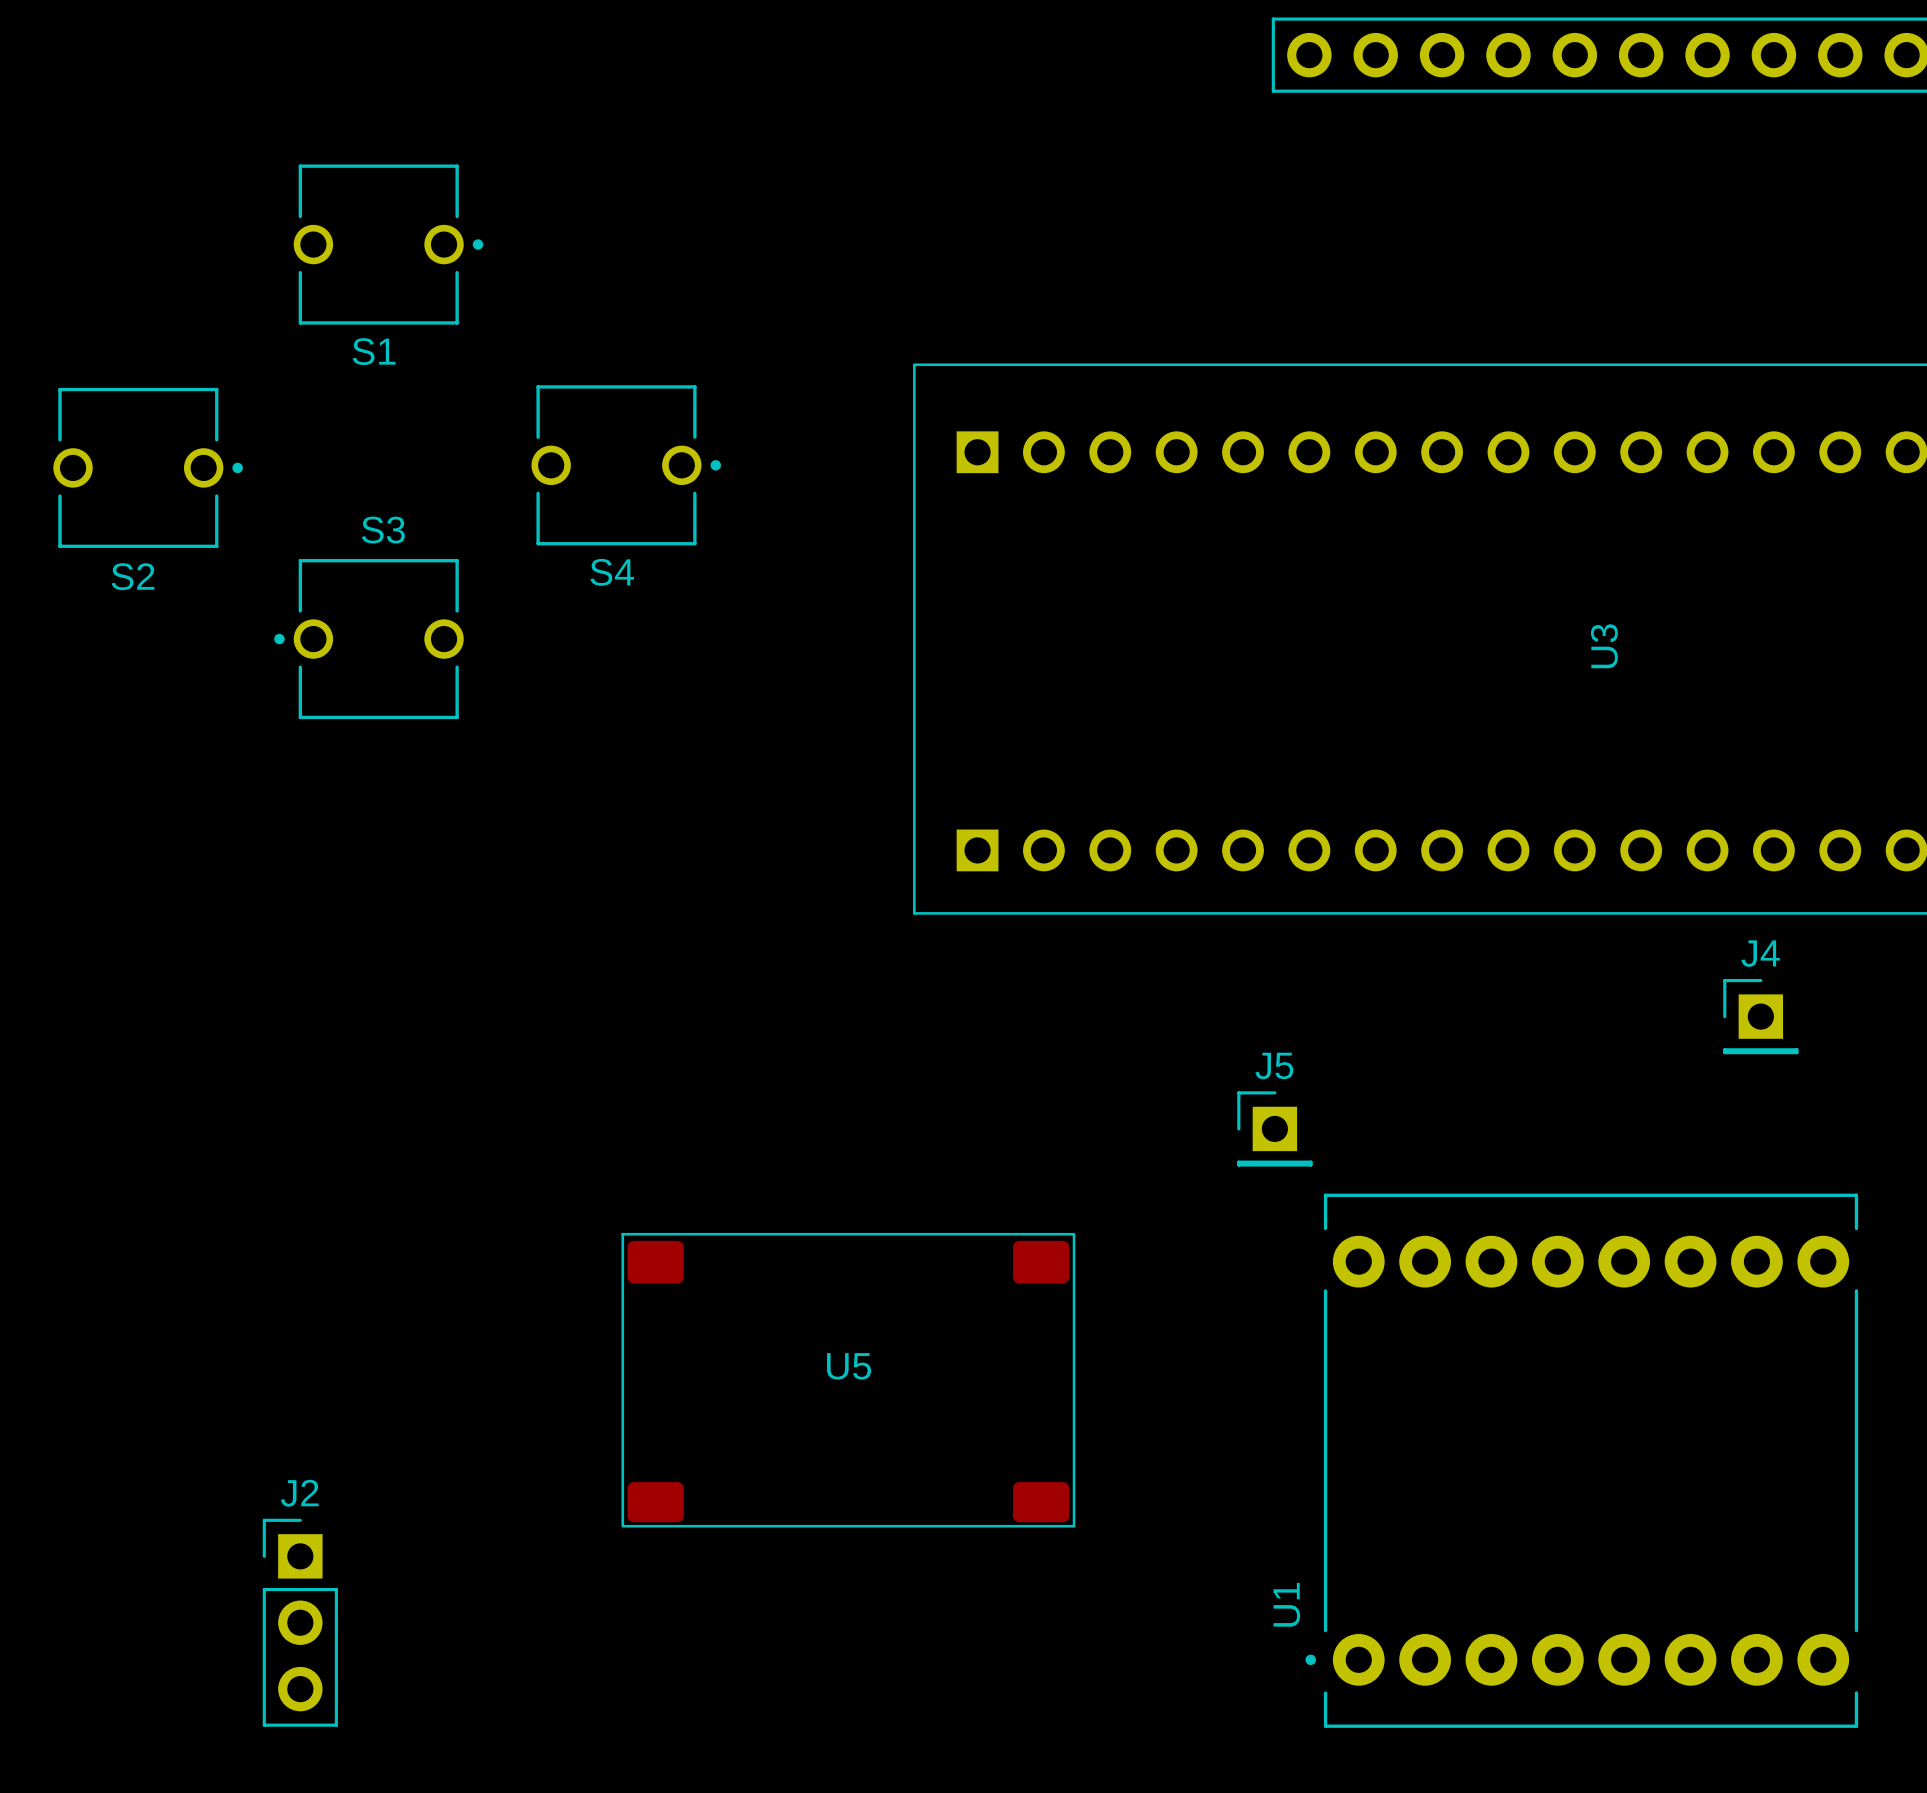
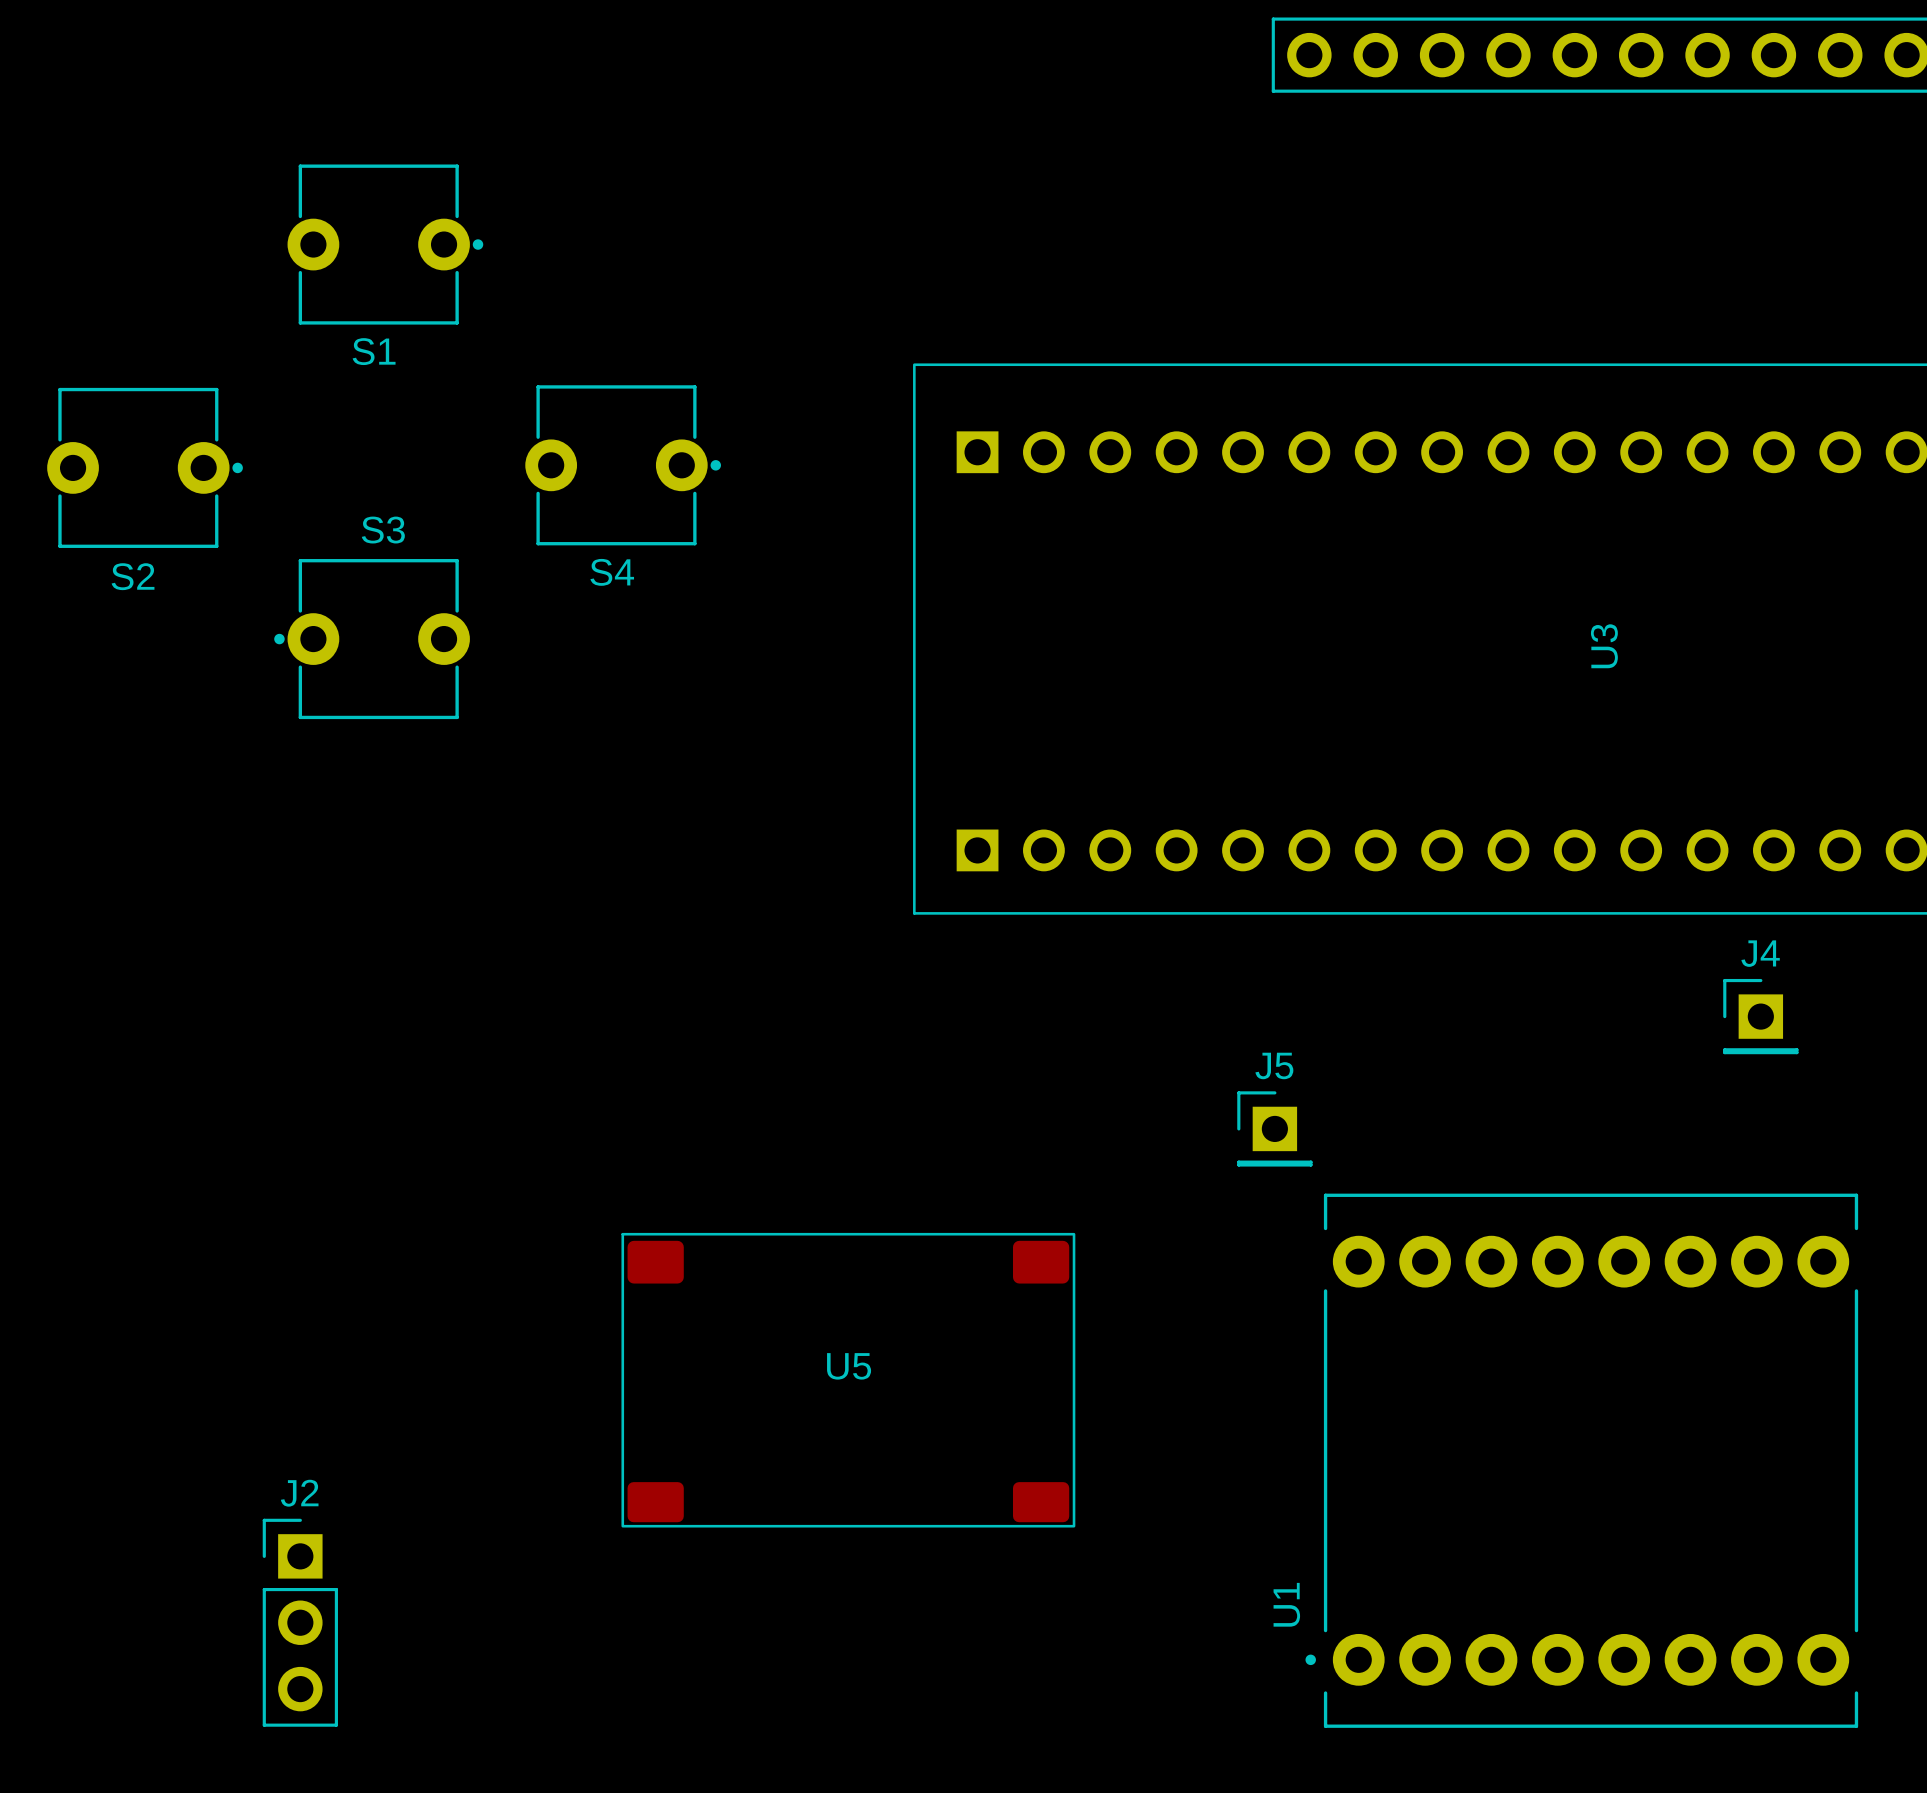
S1 footprint: [293, 164, 484, 325] -> [287, 164, 484, 325]
S4 footprint: [531, 385, 721, 546] -> [525, 385, 721, 546]
S2 footprint: [53, 387, 243, 548] -> [47, 387, 243, 548]
S3 footprint: [274, 559, 464, 720] -> [274, 559, 470, 720]

